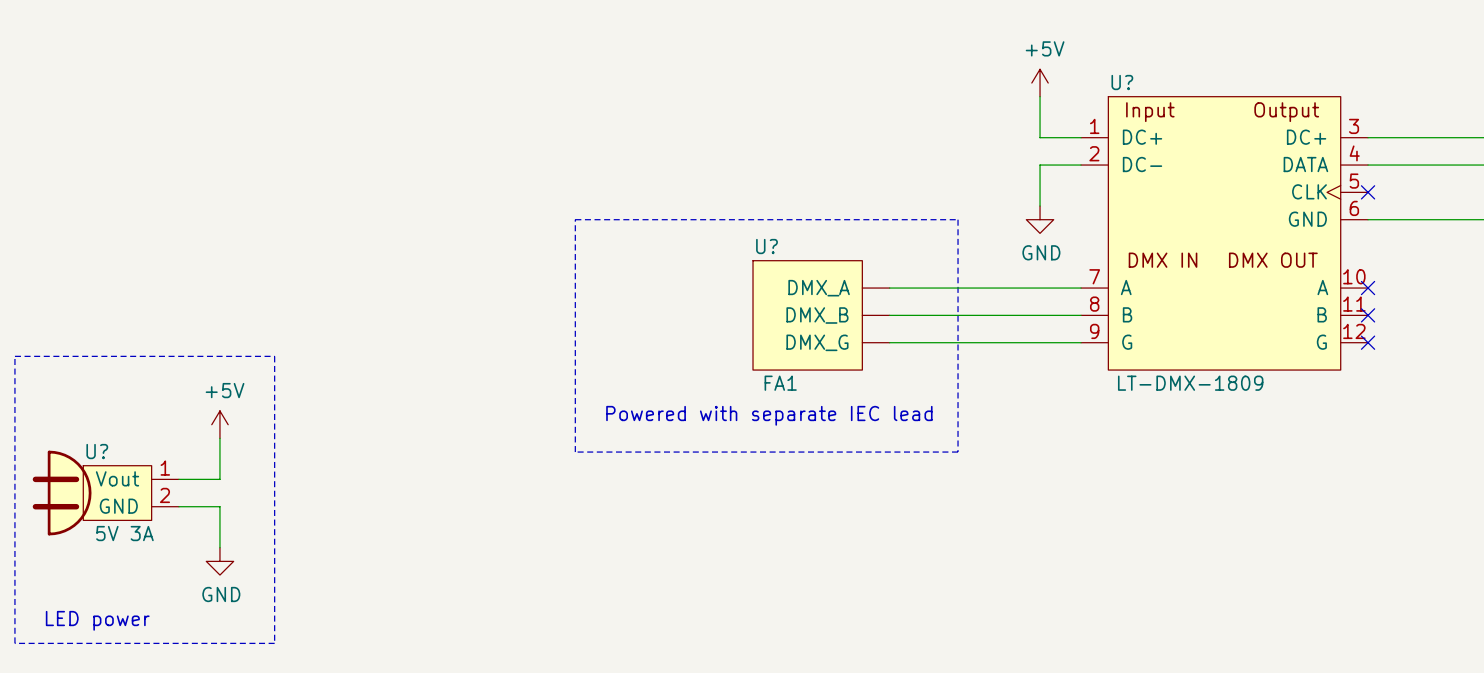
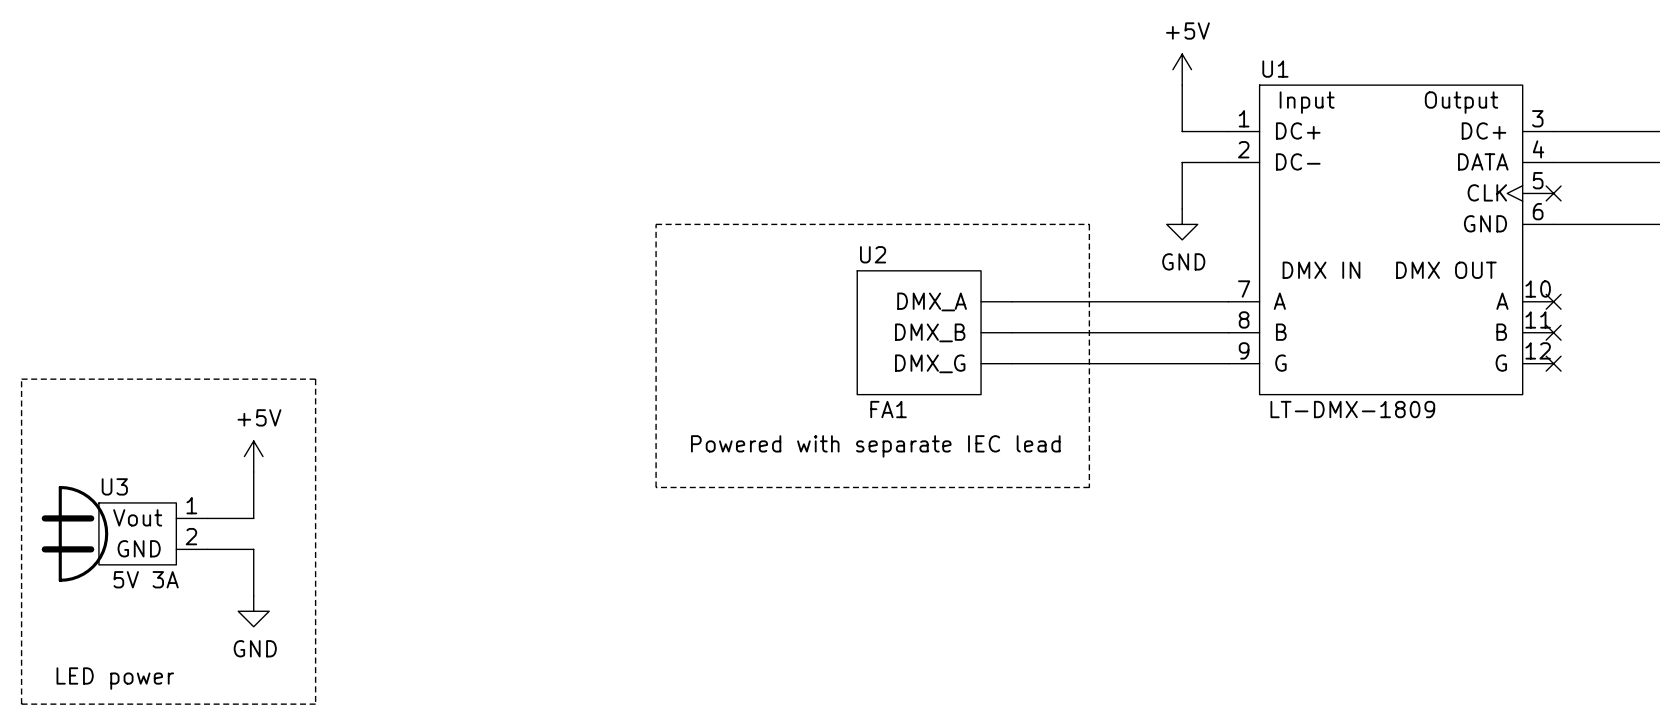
U? name: U? (1122, 82) -> U1 (1275, 69)
U? name: U? (767, 246) -> U2 (873, 254)
U? name: U? (97, 451) -> U3 (114, 486)

